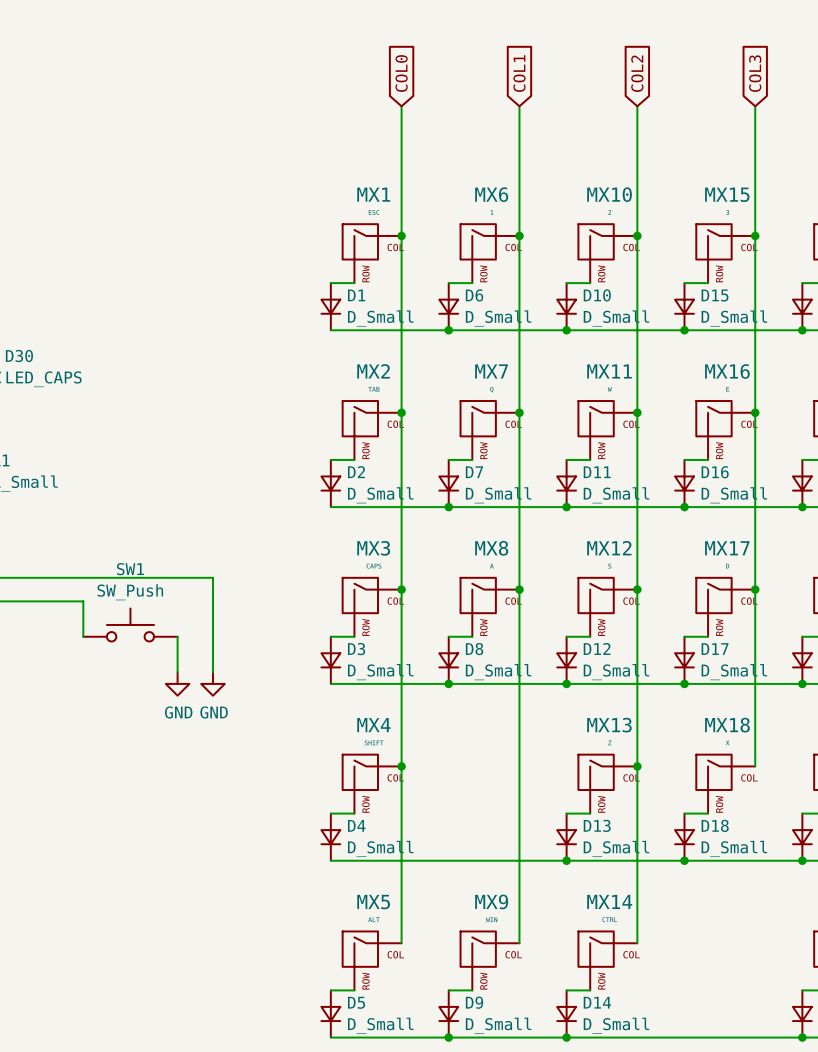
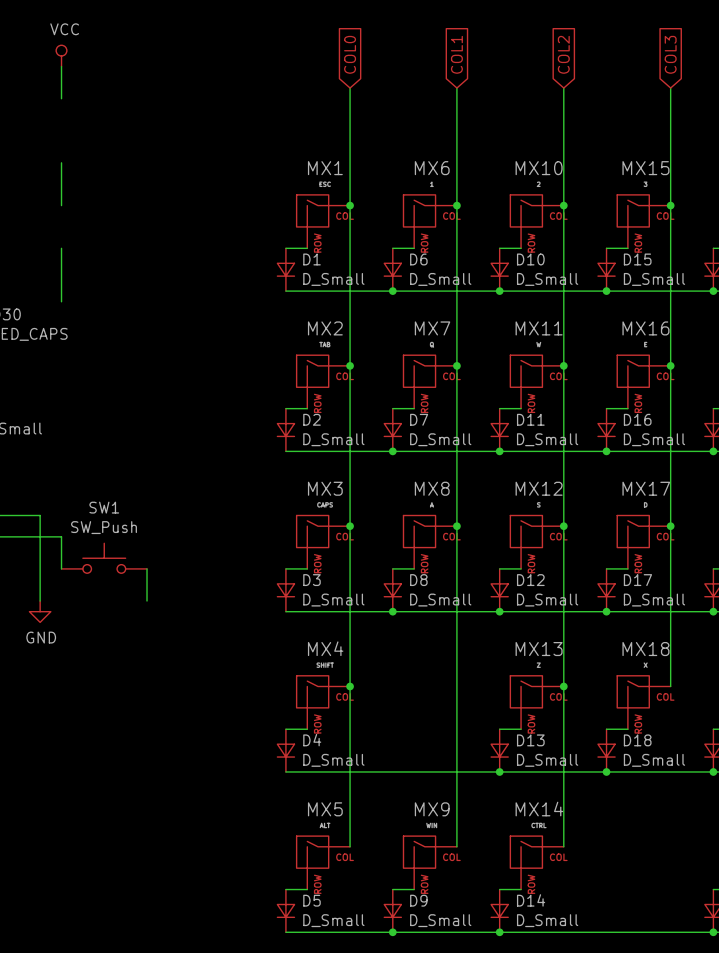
power symbol: none -> VCC (61, 55)
wire: none -> (61, 66) (61, 98)
wire: none -> (61, 162) (61, 205)
wire: none -> (61, 248) (61, 301)
wire: (59, 577) (212, 577) (212, 672) -> (40, 515) (40, 601)
power symbol: none -> GND (40, 611)
power symbol: GND (177, 683) -> none
power symbol: GND (212, 683) -> none

